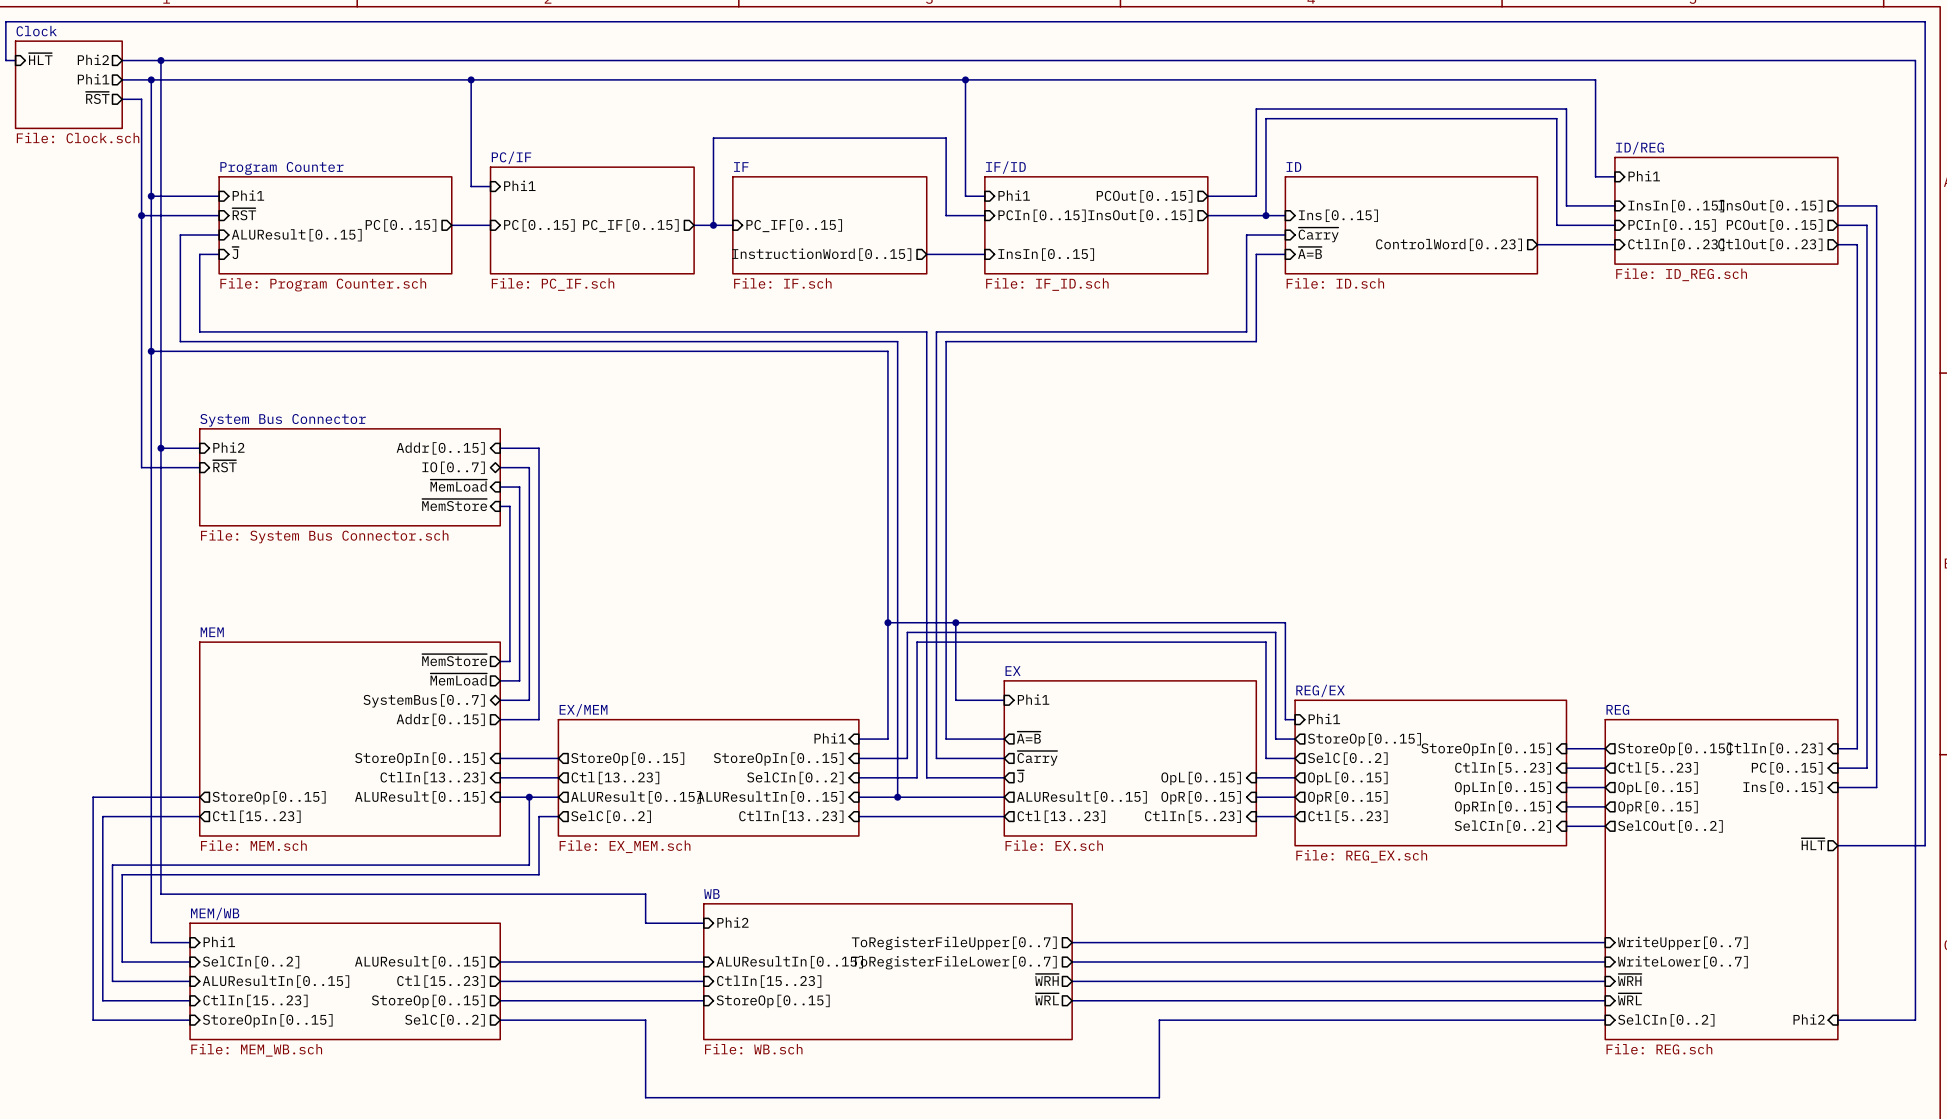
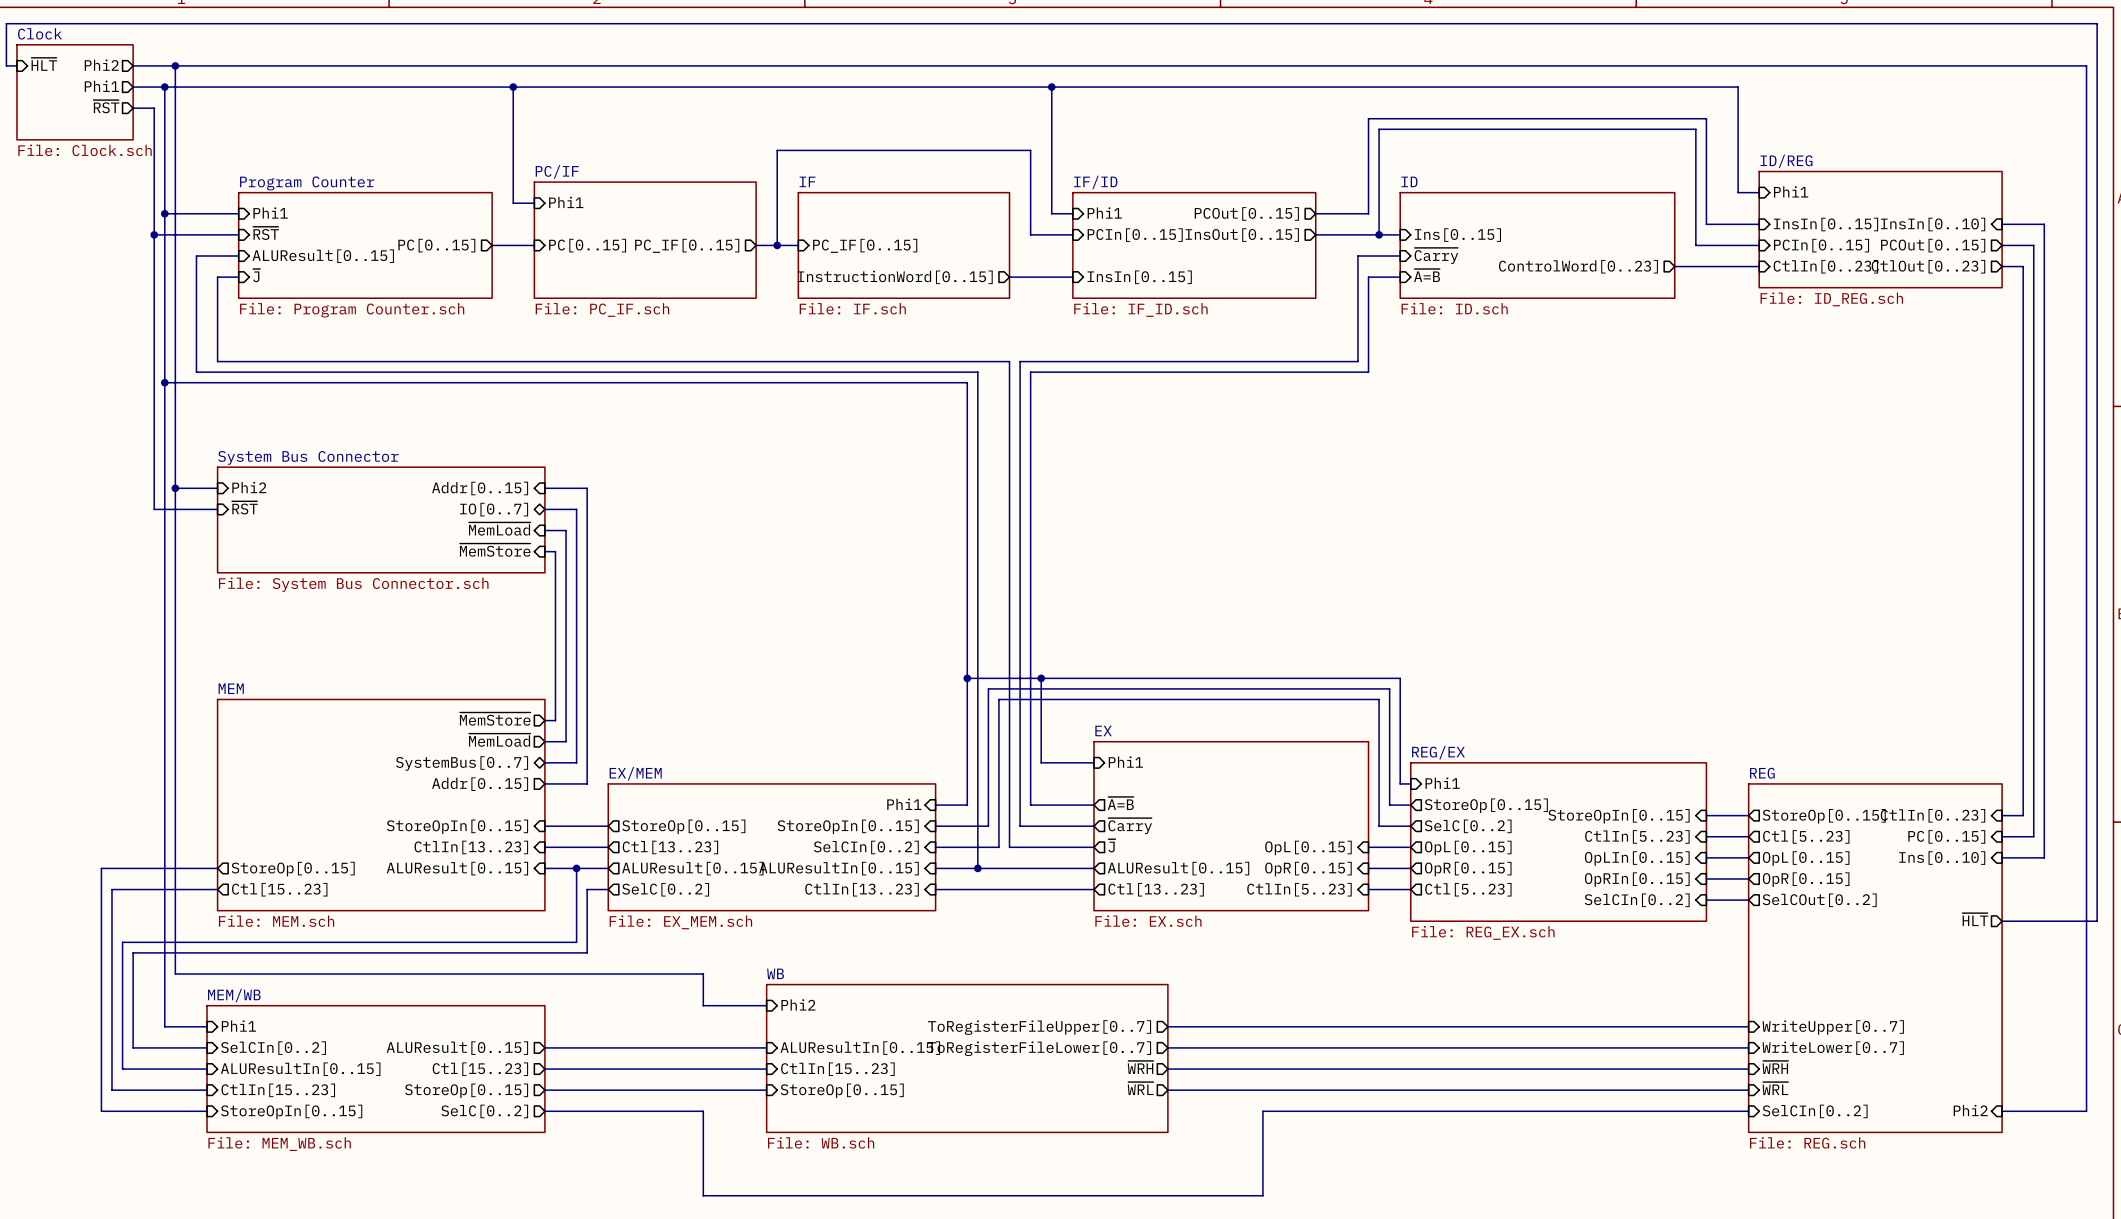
sheet pin shape: output (1770, 206) -> input (1933, 224)
sheet pin: InsOut[0..15] (1770, 206) -> InsIn[0..10] (1933, 224)
sheet pin: Ins[0..15] (1782, 787) -> Ins[0..10] (1942, 858)

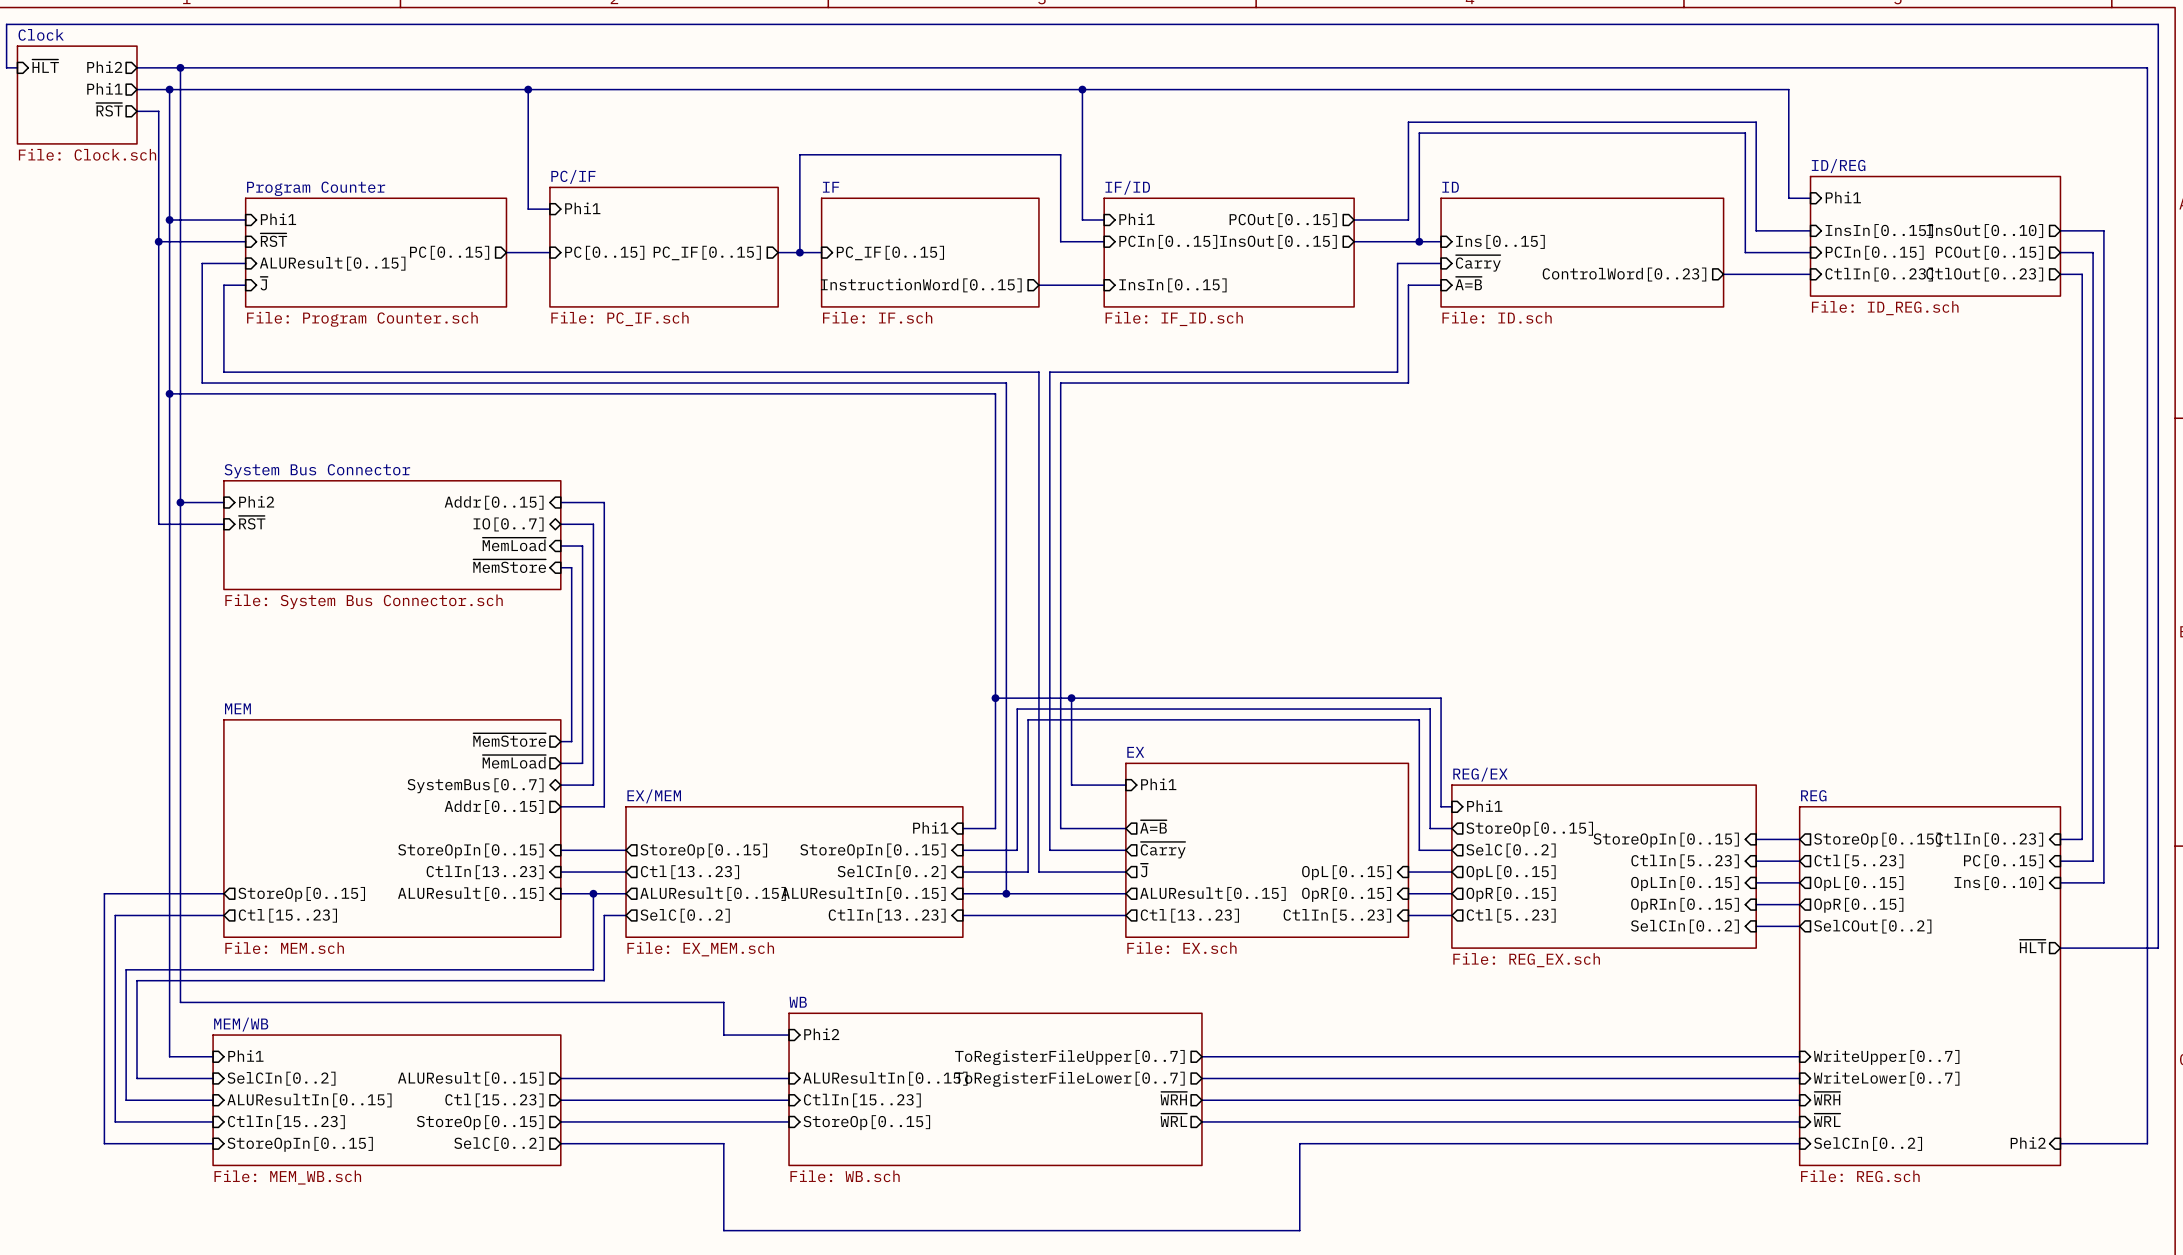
sheet pin shape: input (1933, 224) -> output (1984, 231)
sheet pin: InsIn[0..10] (1933, 224) -> InsOut[0..10] (1984, 231)

